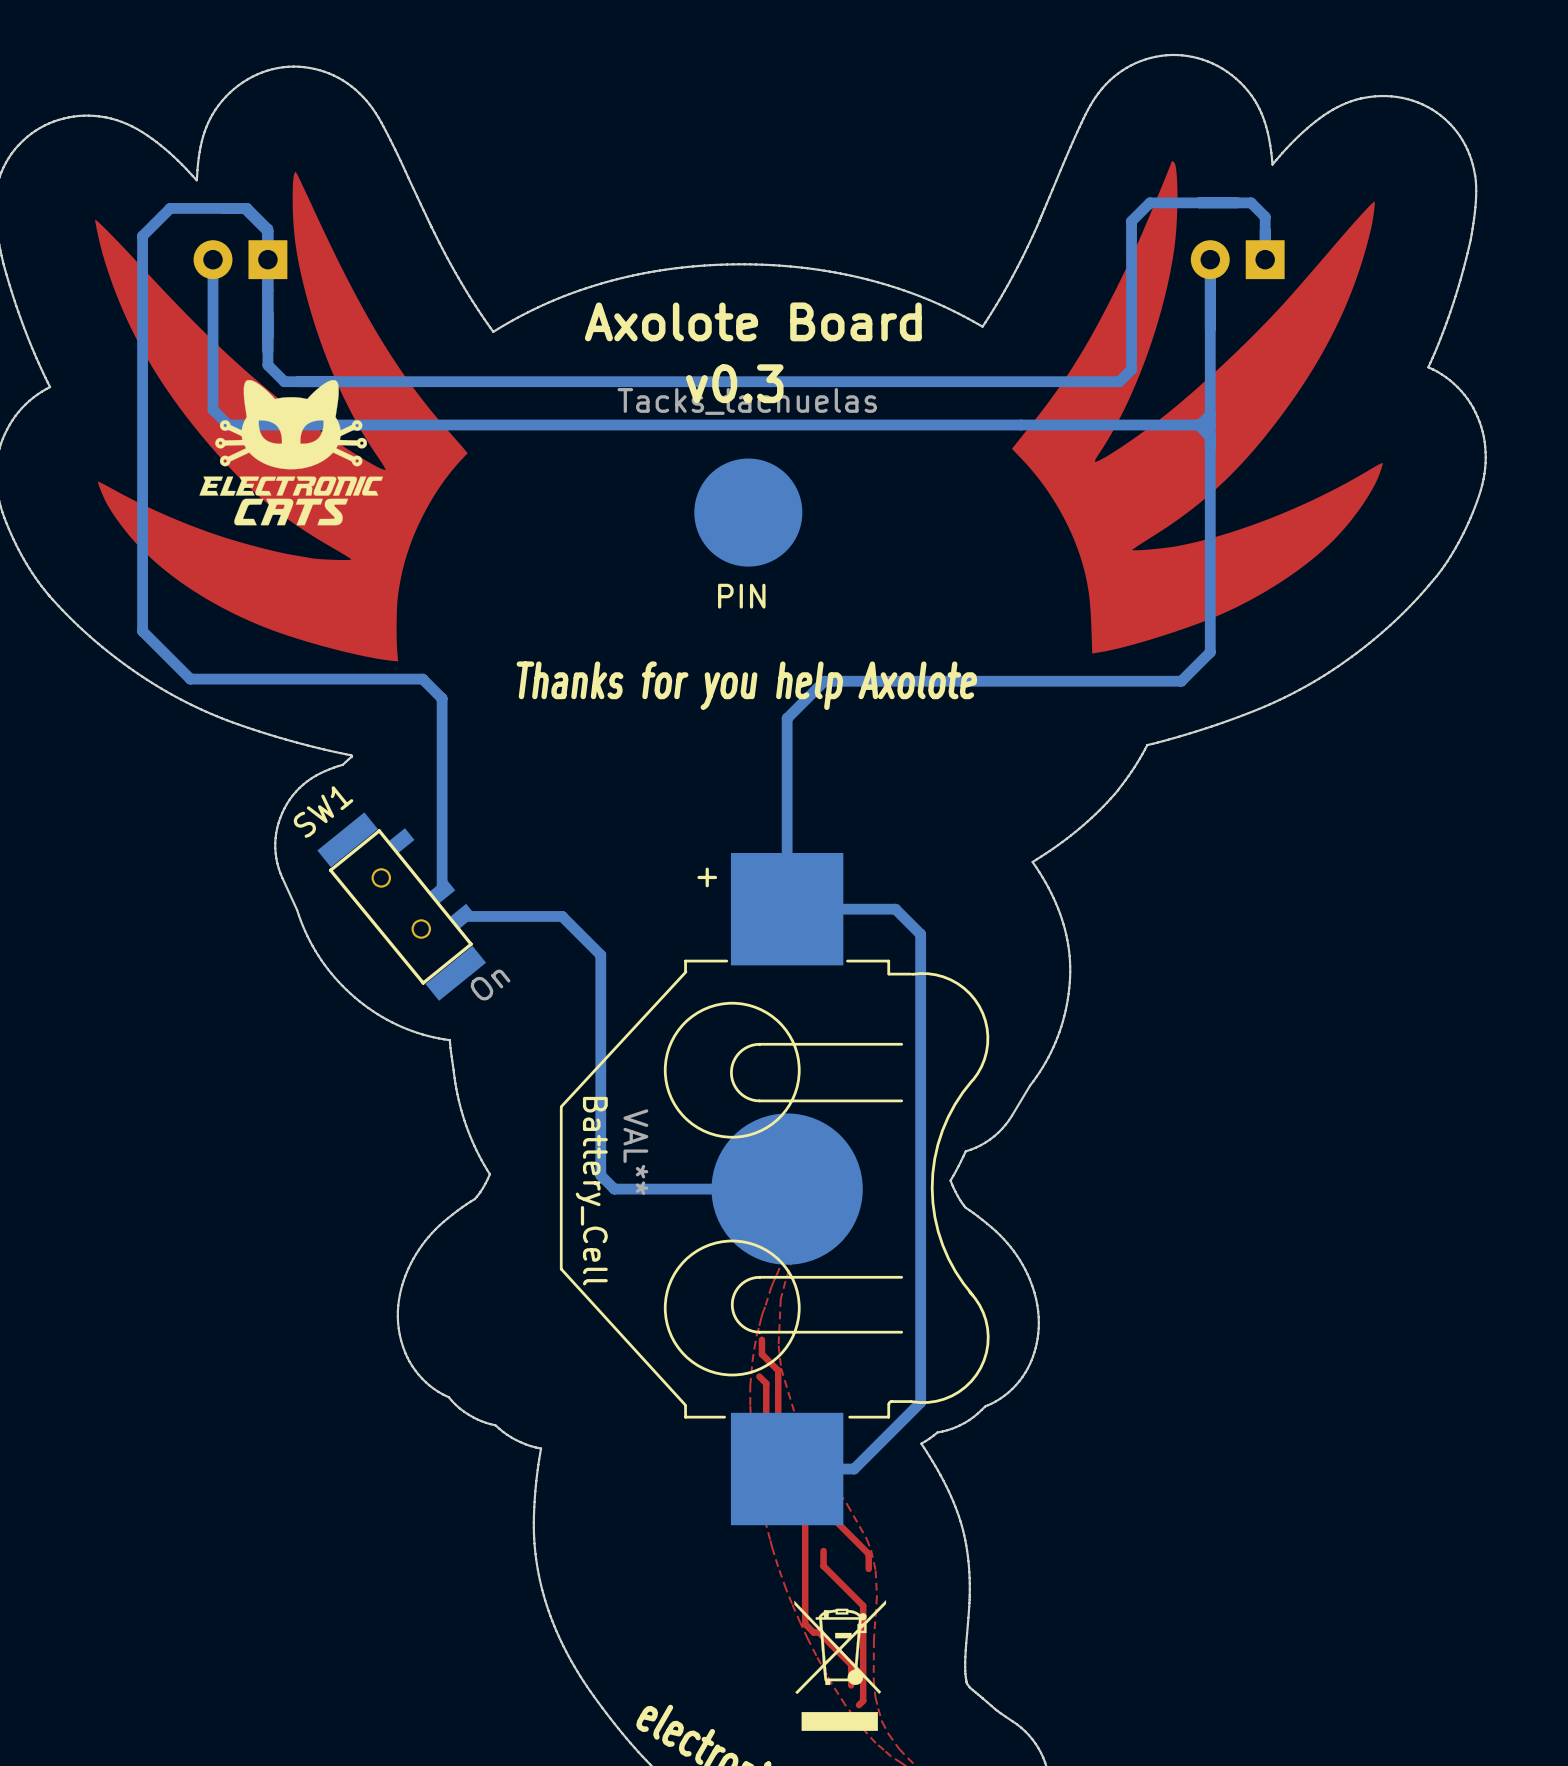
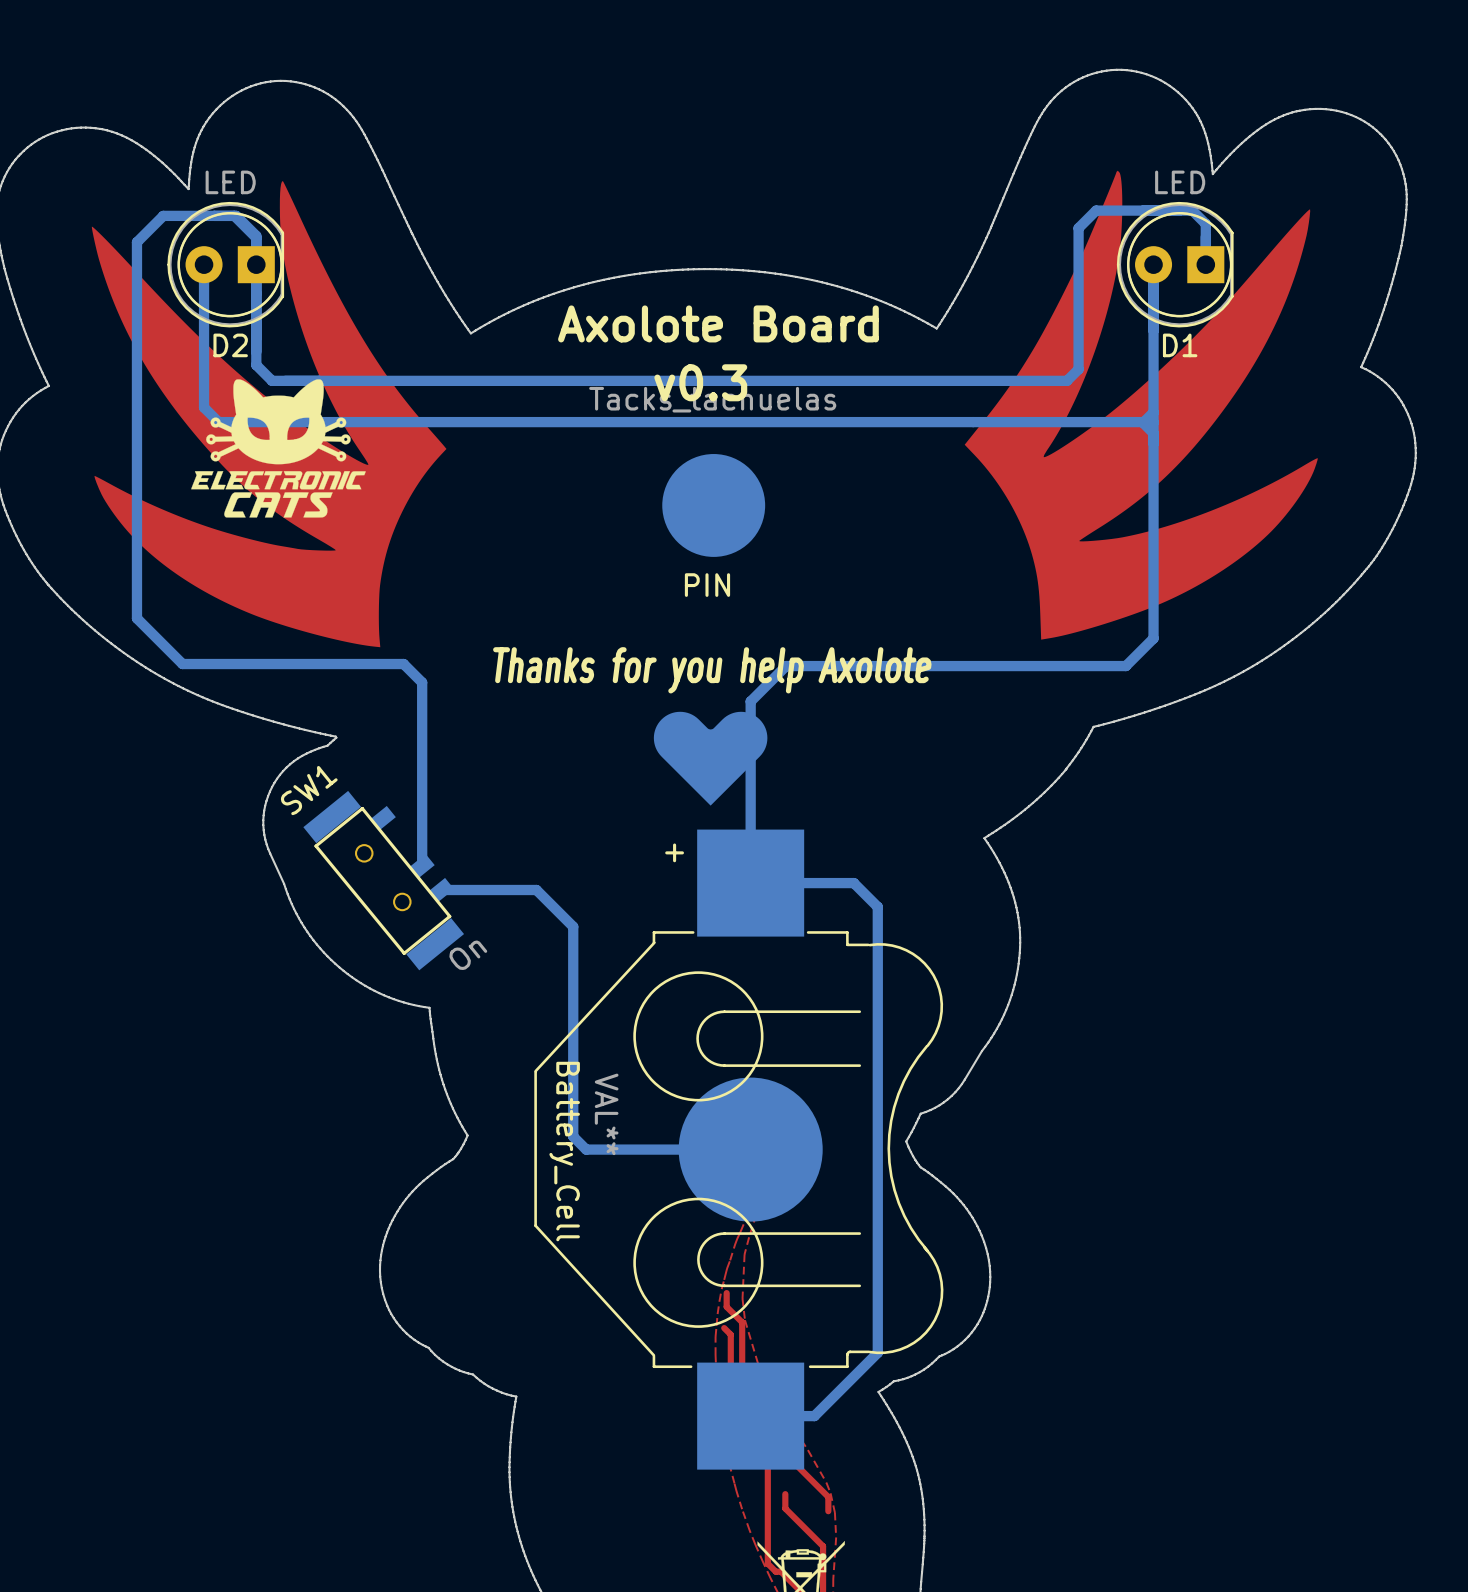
D2 side: top (240, 259) -> bottom (225, 264)
D1 side: top (1237, 259) -> bottom (1175, 264)
drawing: none -> [653, 711, 768, 806]

